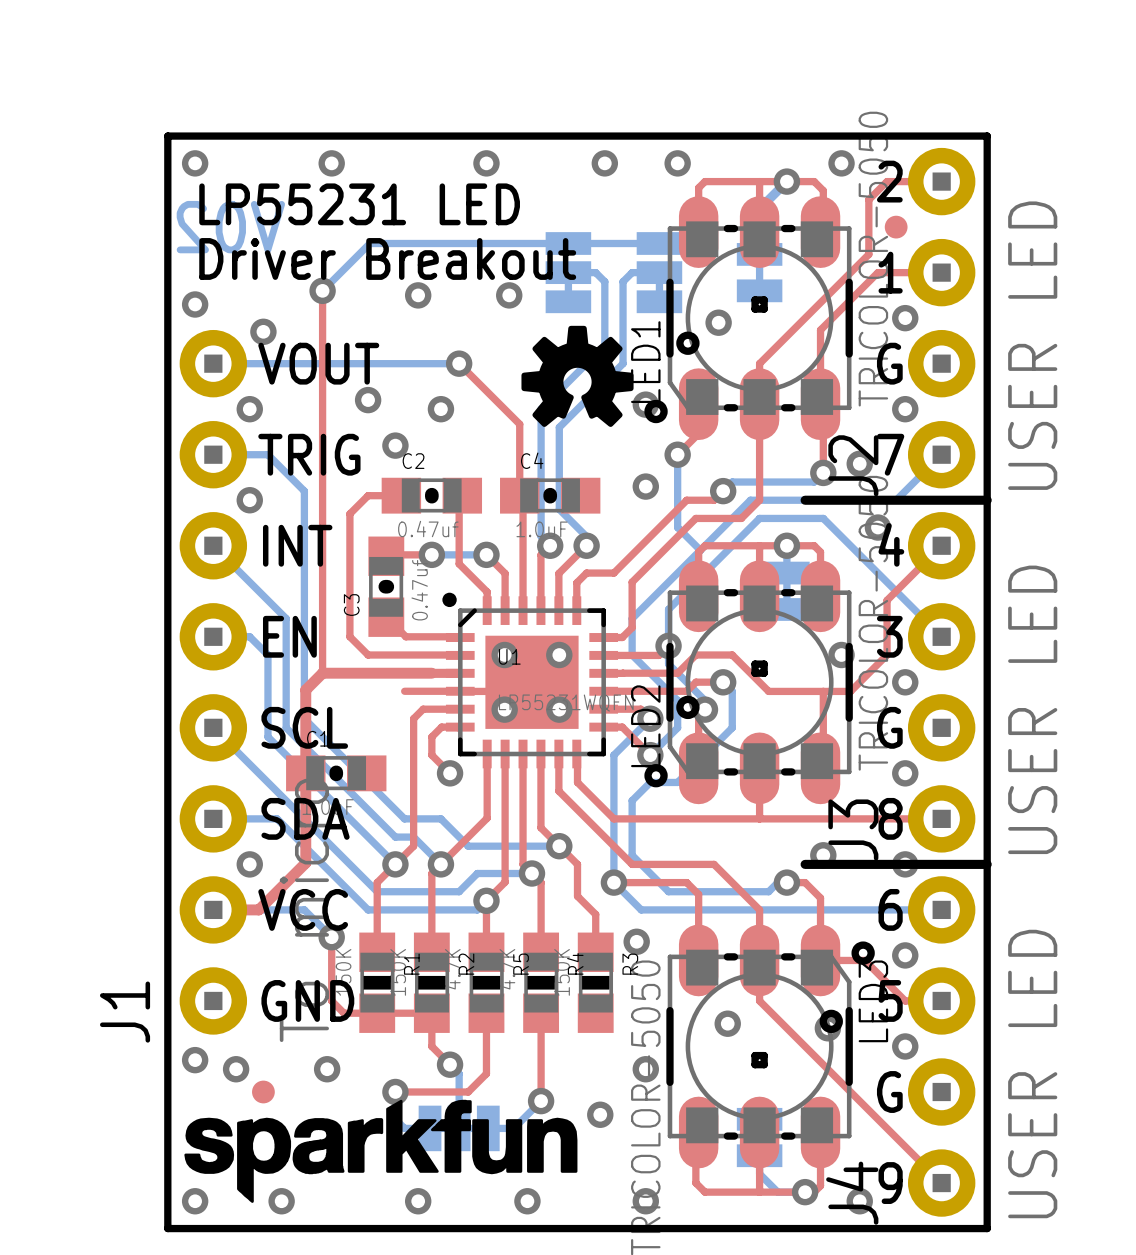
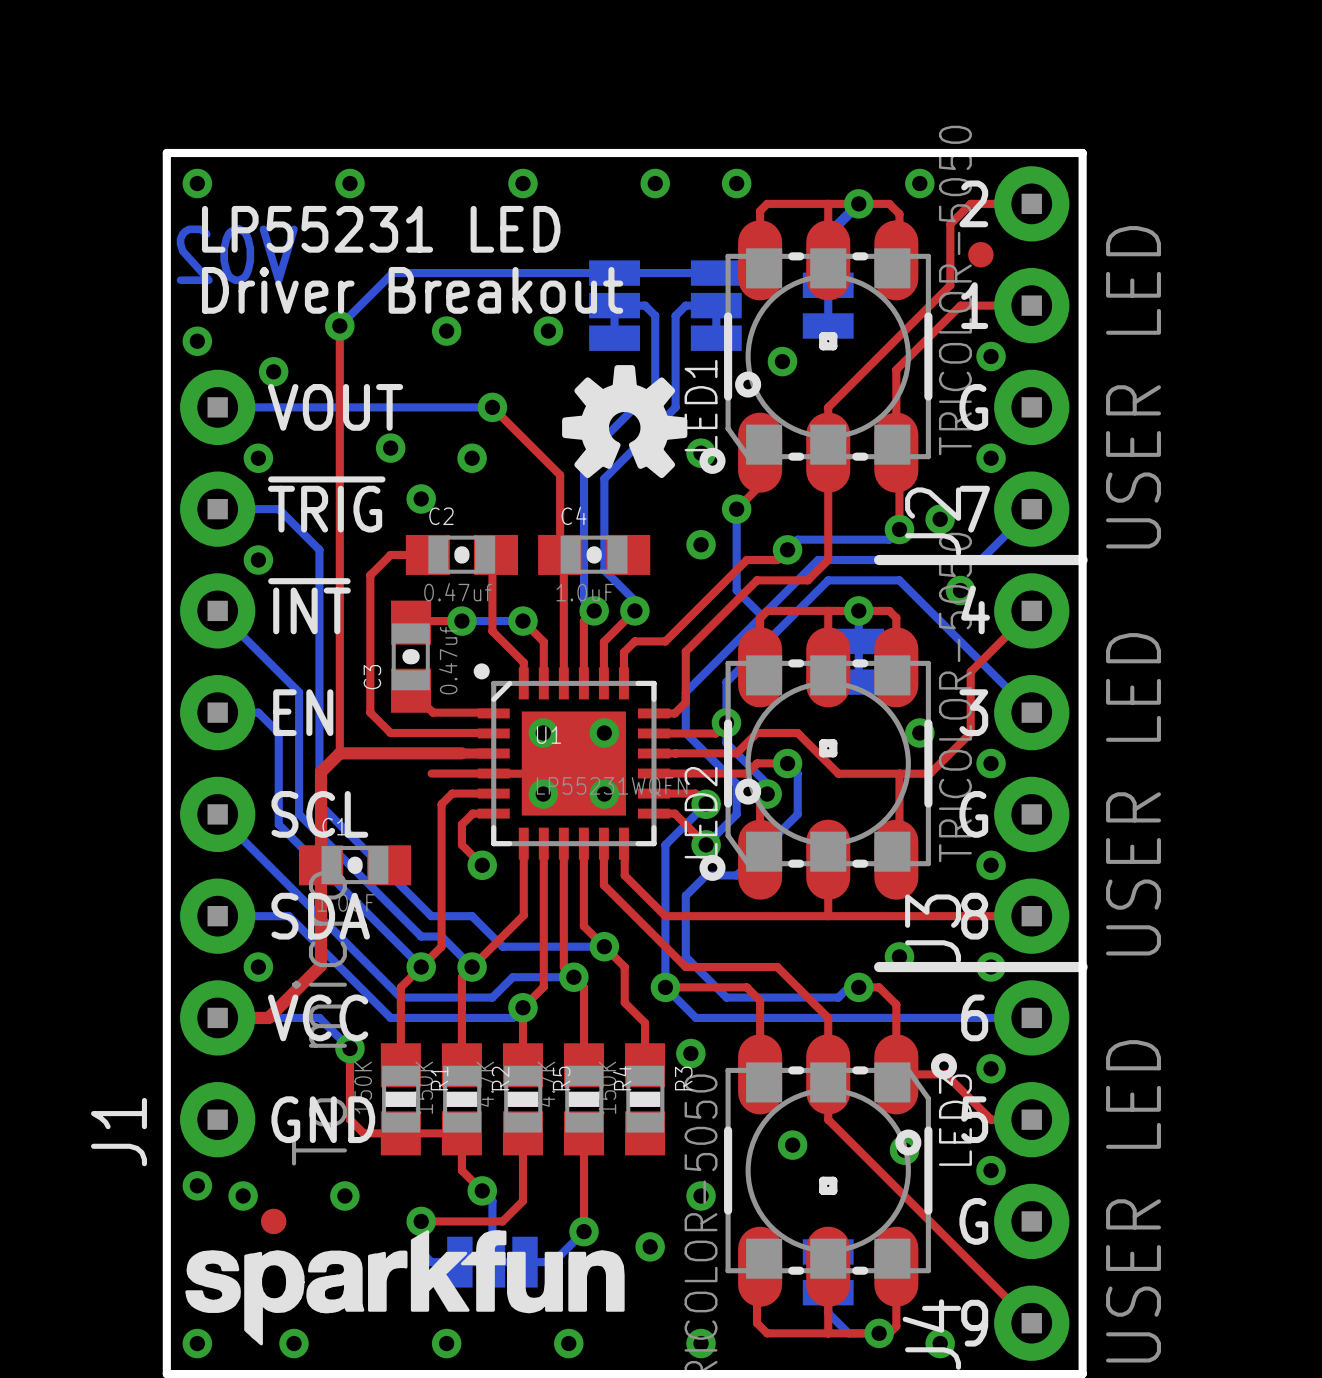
text: TRIG (309, 454) -> ~{TRIG} (326, 504)
text: INT (297, 545) -> ~{INT} (309, 606)

